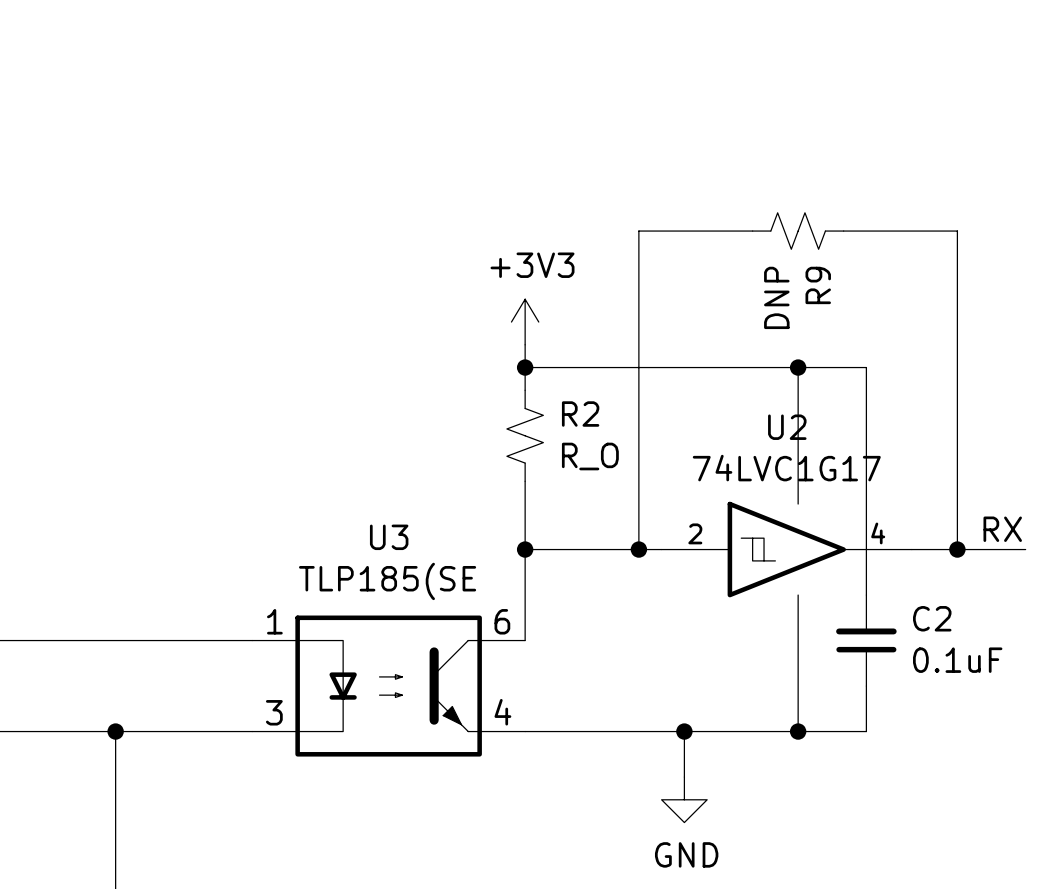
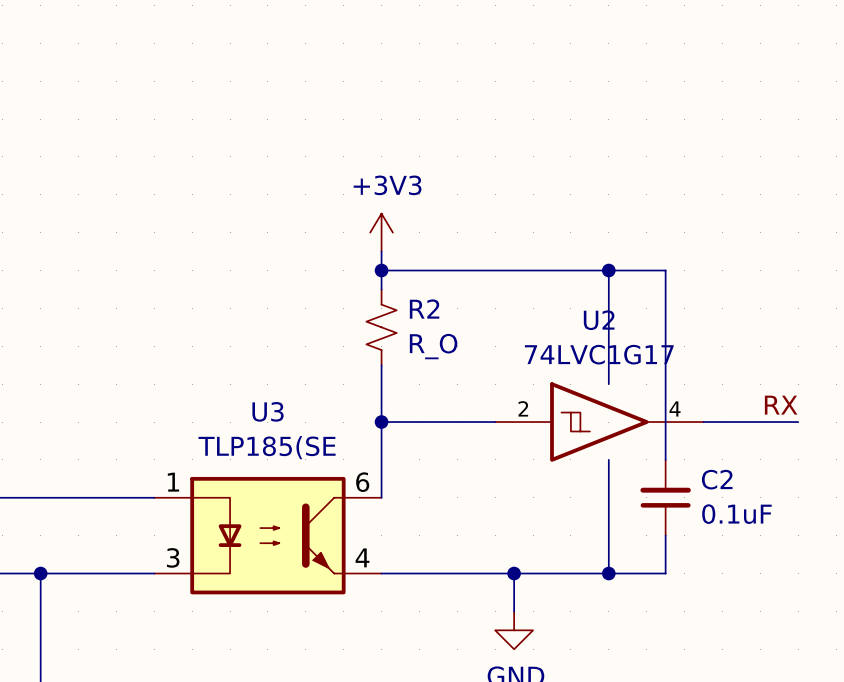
wire: (752, 231) (638, 231) (638, 549) -> none
R9: DNP (798, 231) -> none
wire: (843, 231) (957, 231) (957, 549) -> none
junction: (638, 549) -> none
junction: (957, 549) -> none

